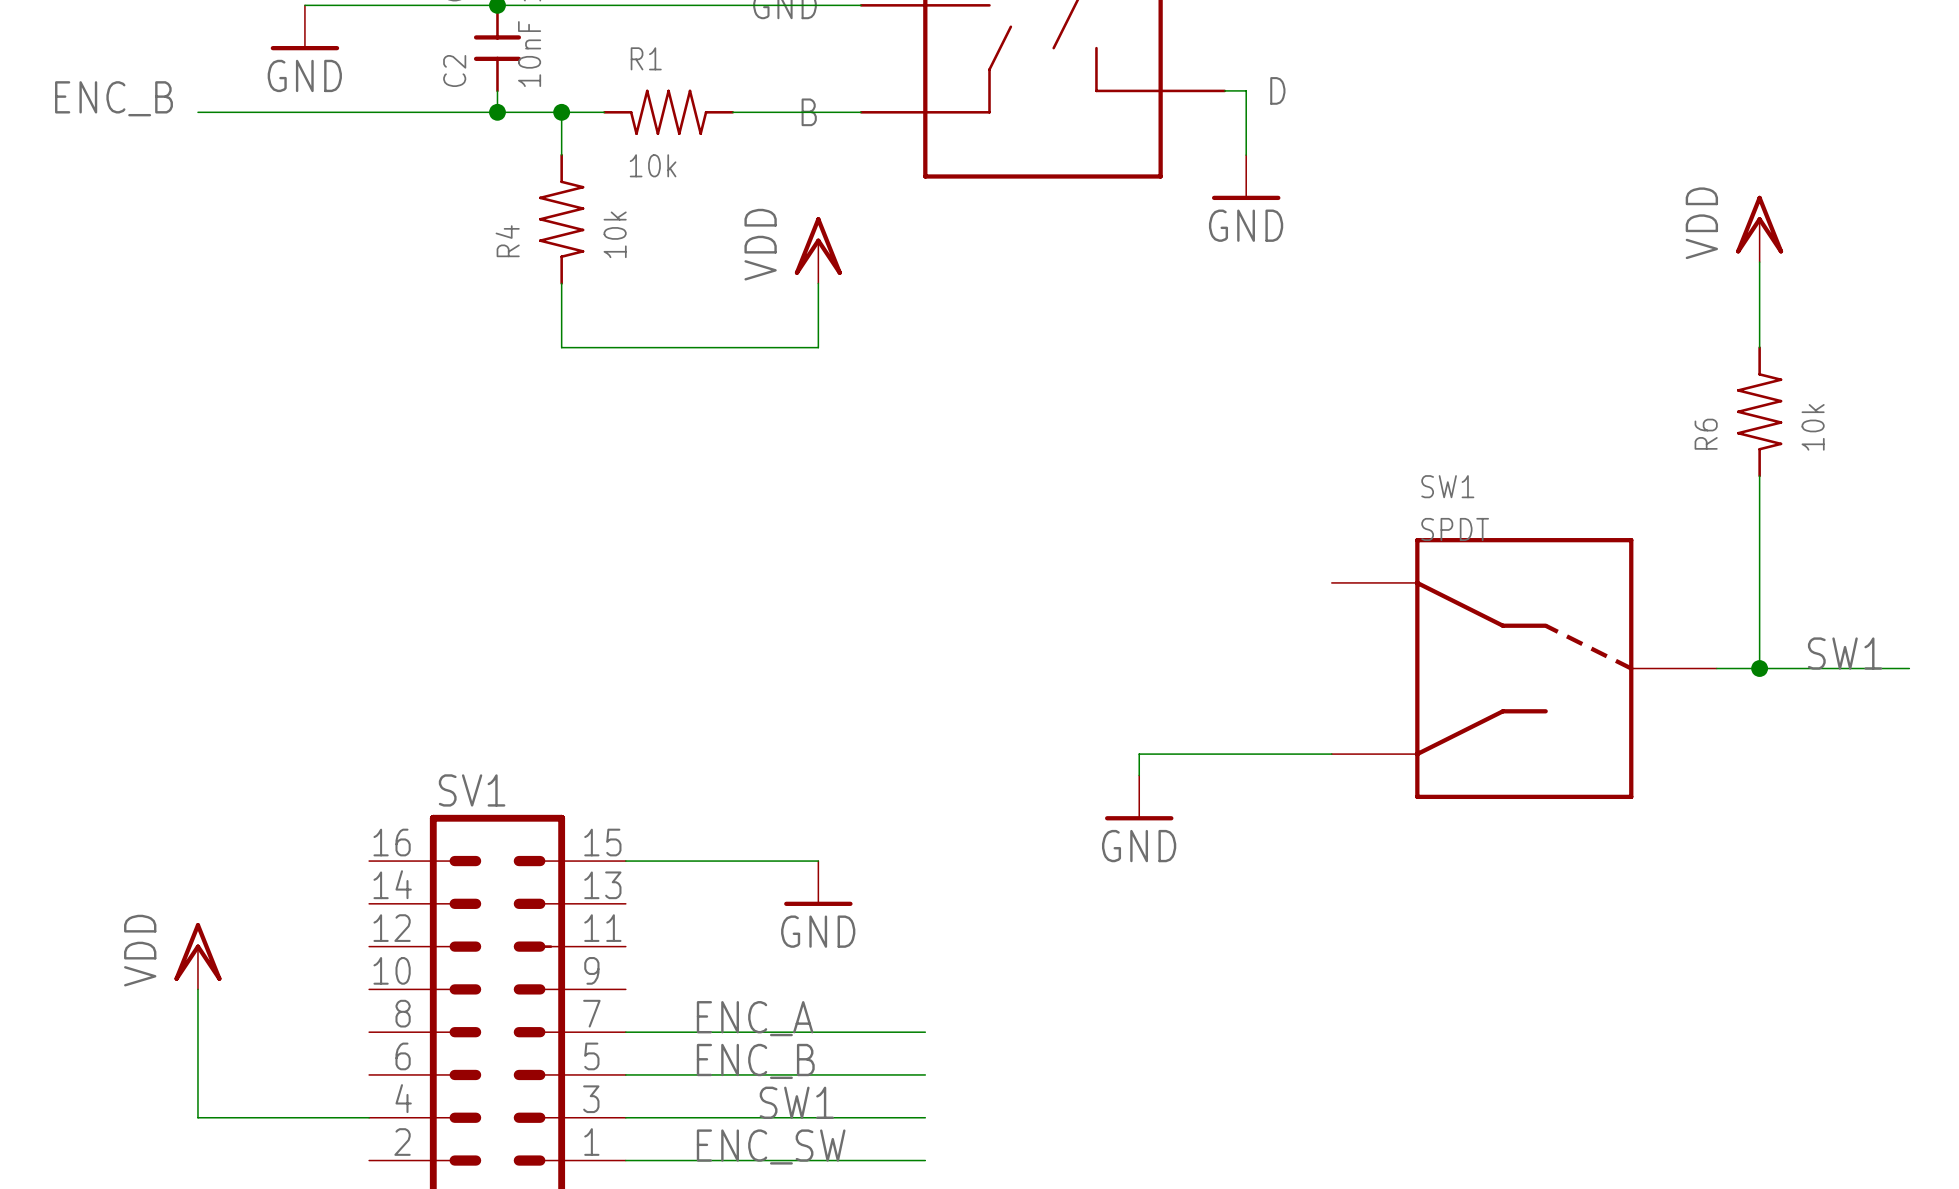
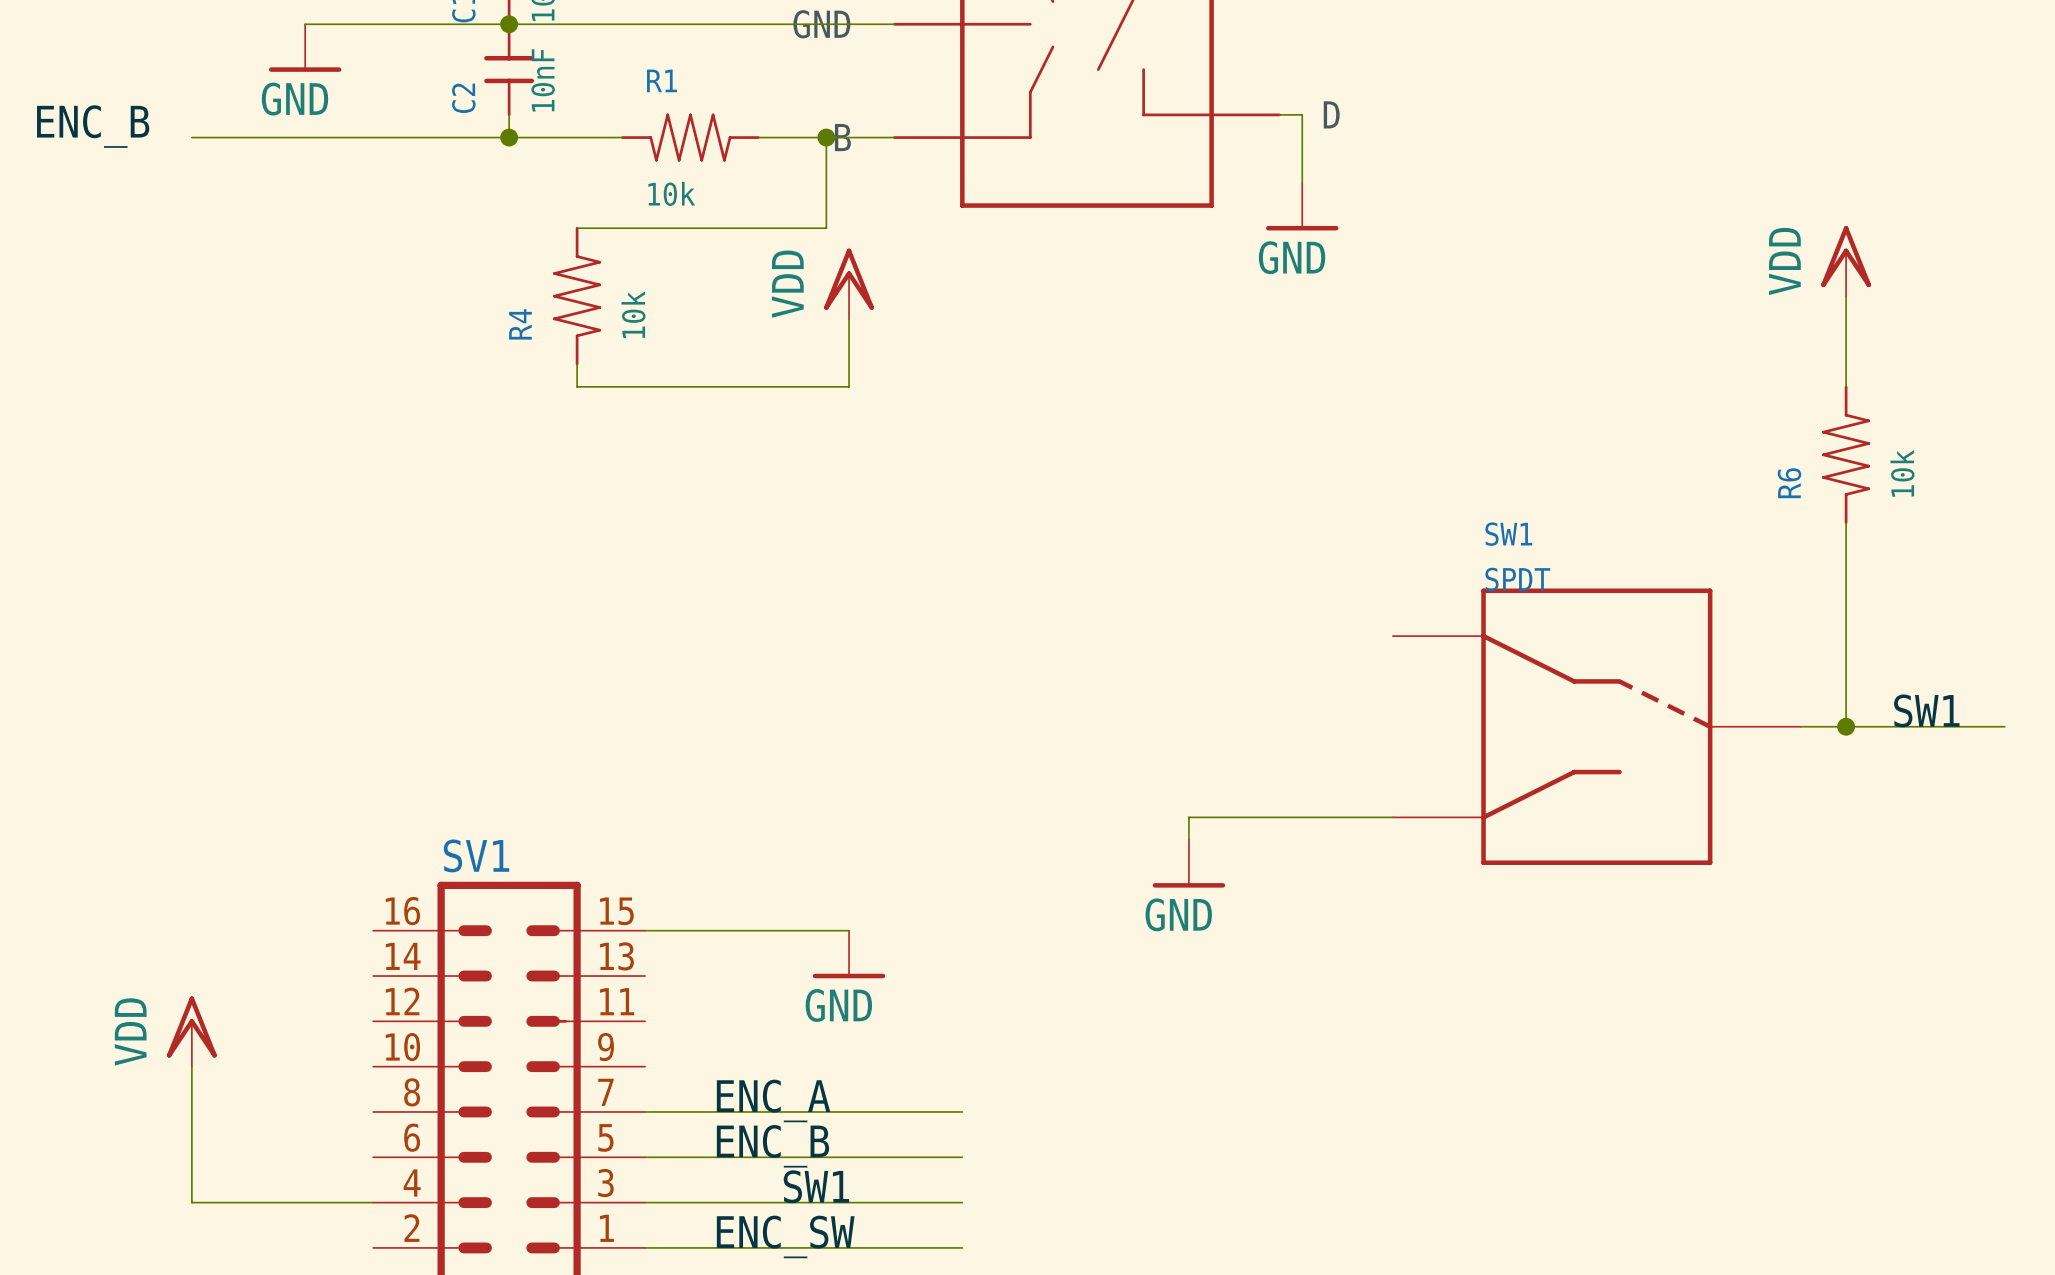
wire: (561, 112) (561, 155) -> none
junction: (561, 112) -> none
wire: none -> (826, 137) (826, 228) (577, 228)
junction: none -> (826, 137)
R4 position: (561, 219) -> (577, 296)

